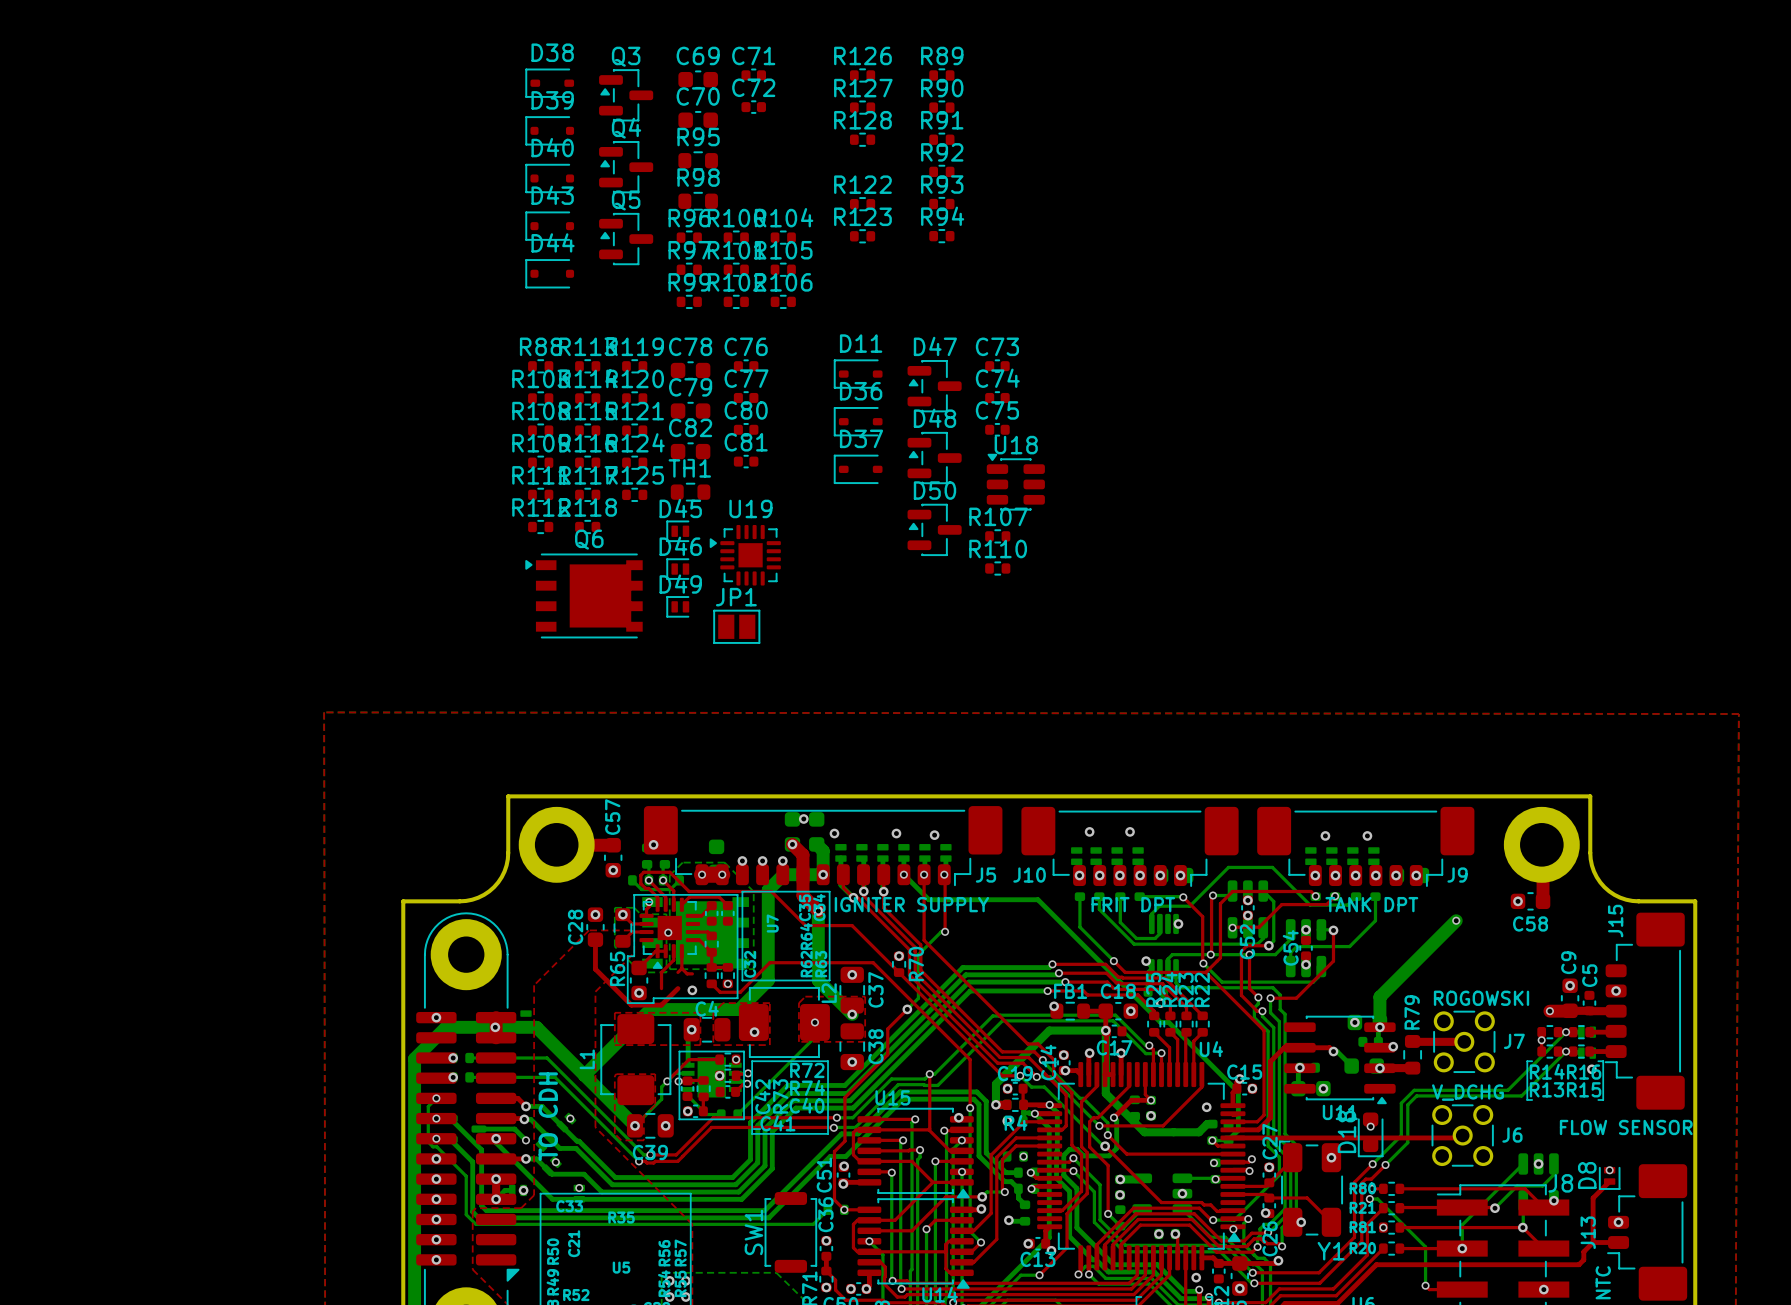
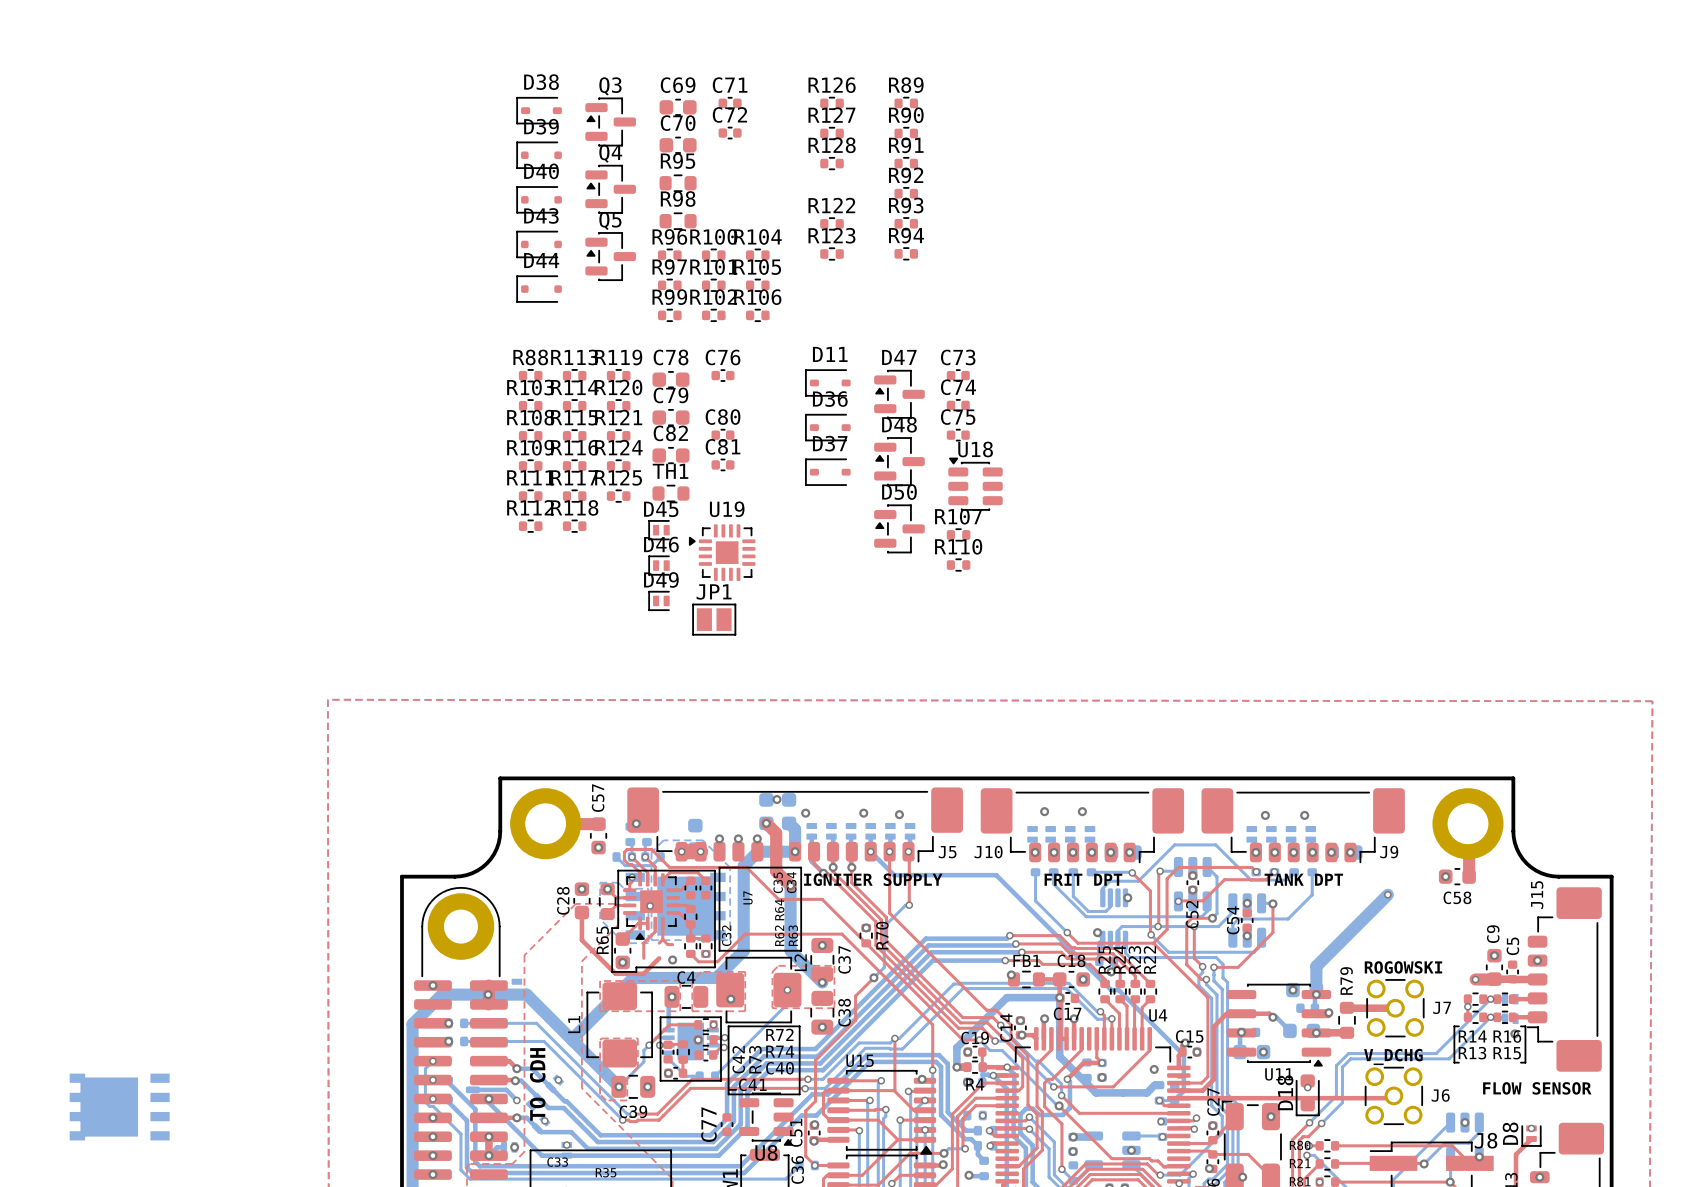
C77 rotation: 0° (746, 397) -> 90° clockwise (727, 1124)
C77 position: (746, 397) -> (727, 1124)
Q6: (583, 595) -> none
part: none -> (119, 1107)
U8: none -> (766, 1119)

